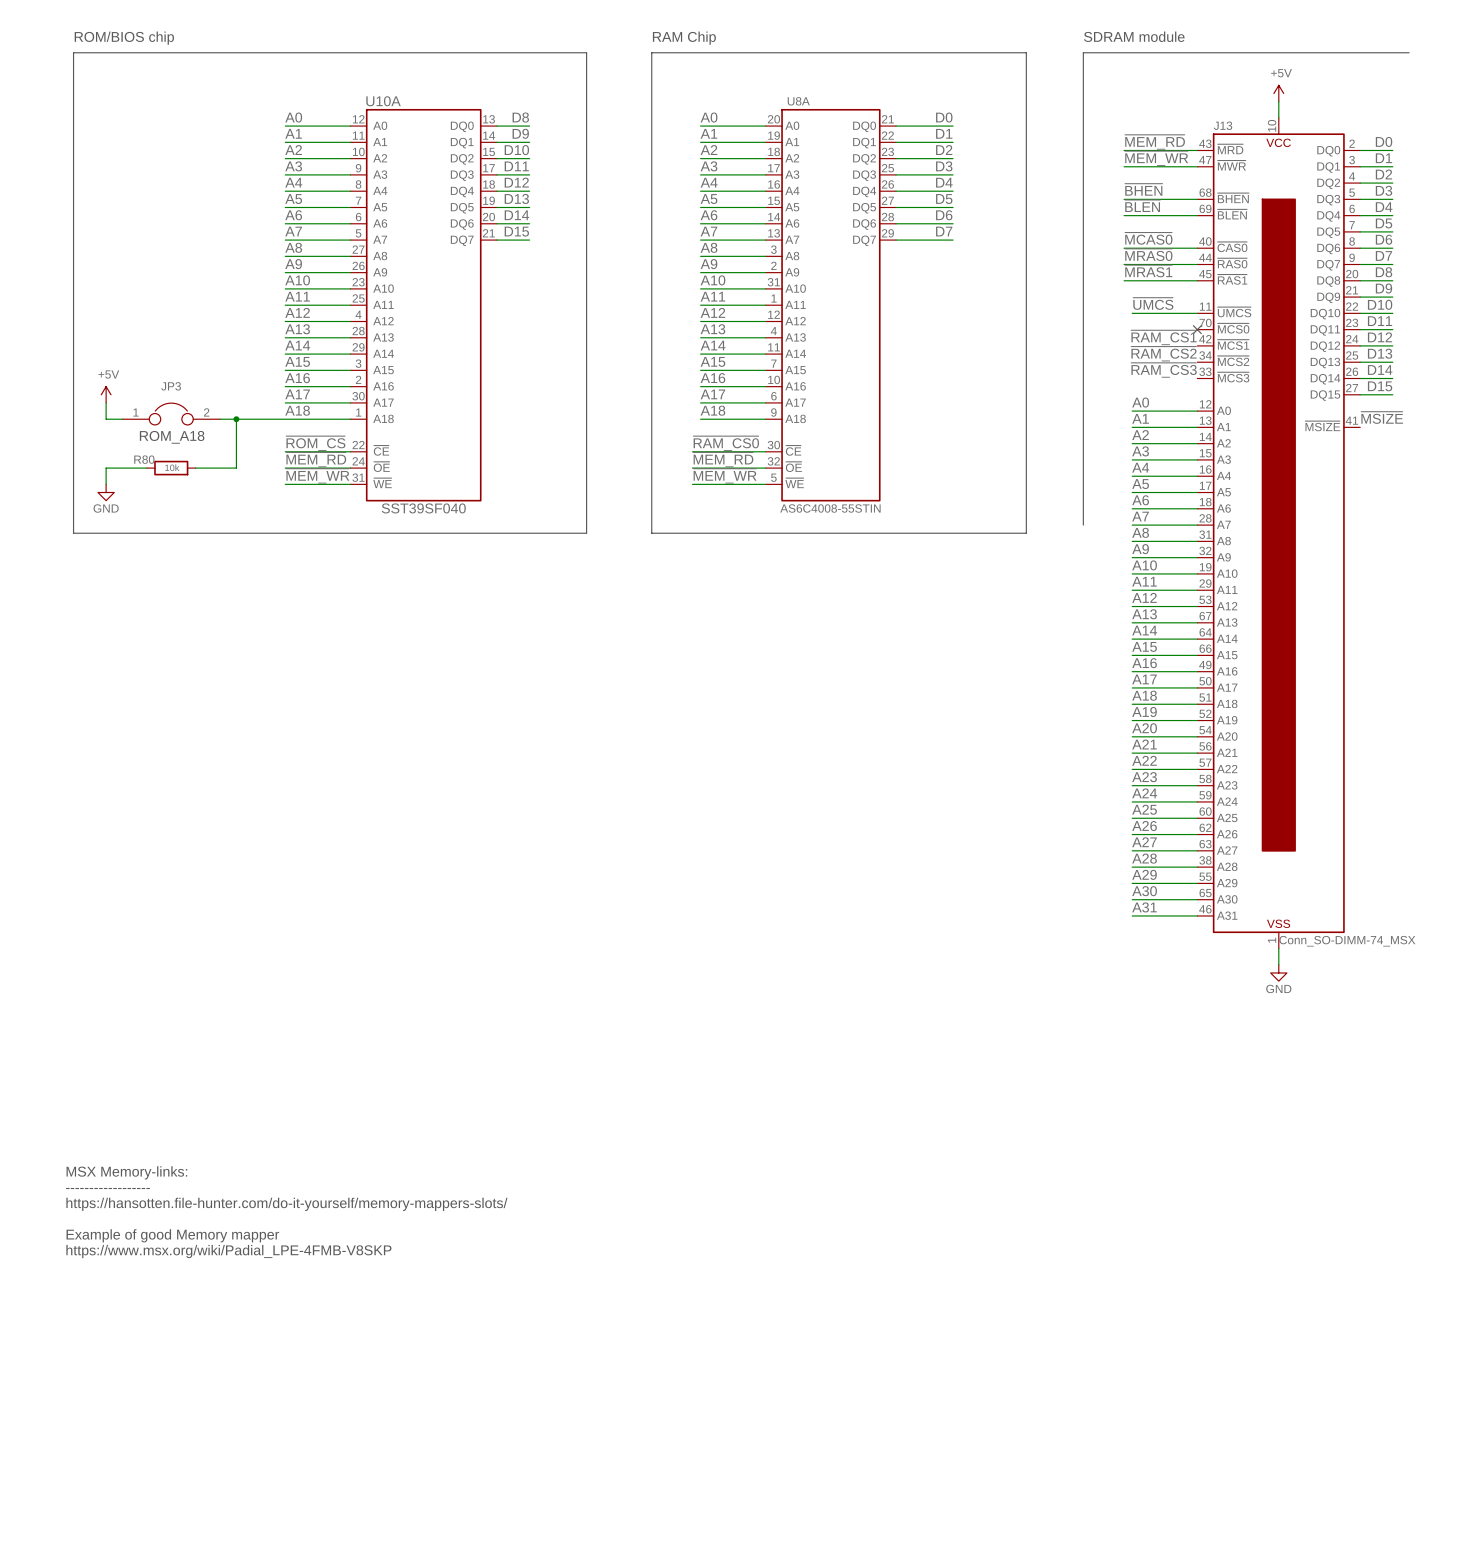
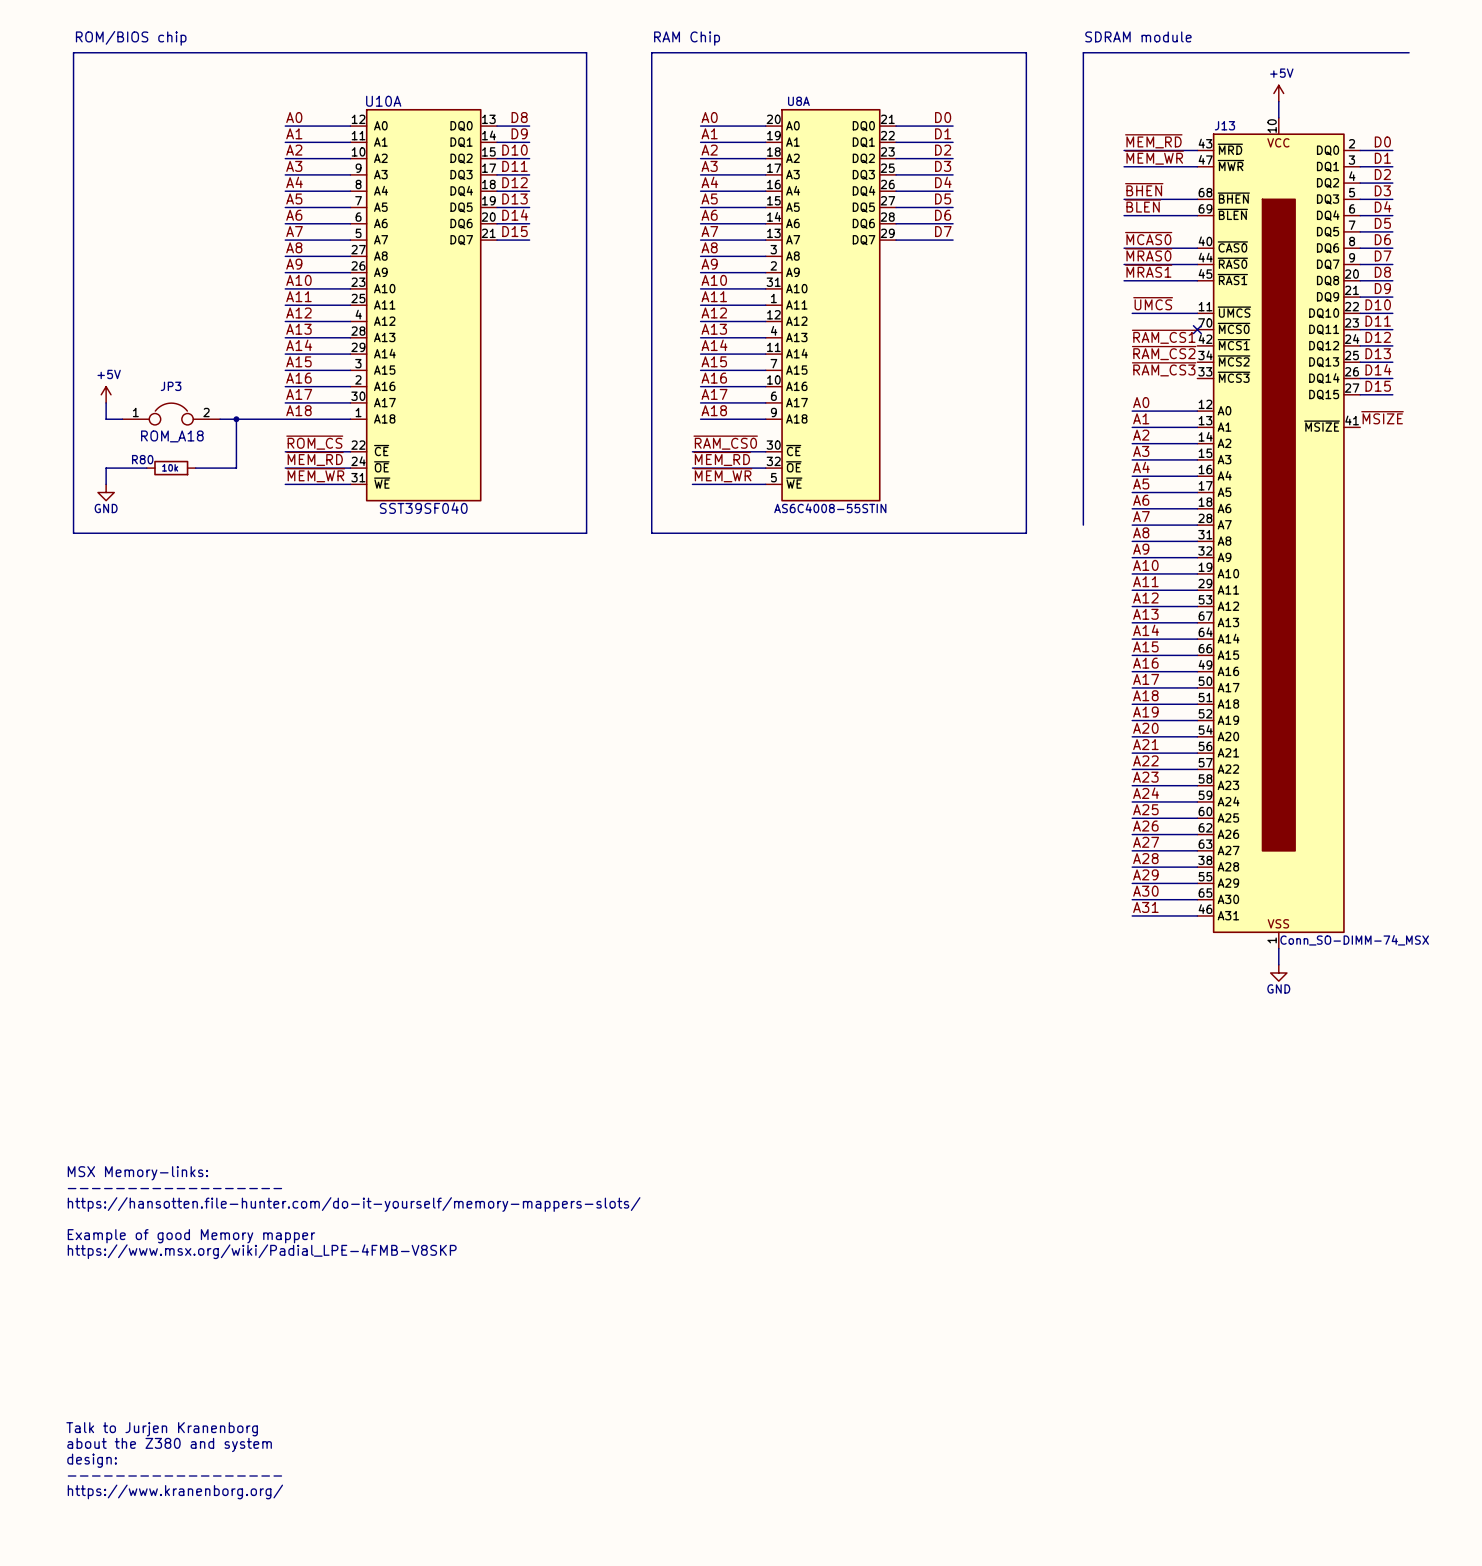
text: none -> Talk to Jurjen Kranenborg (162, 1429)
text: none -> about the Z380 and system (169, 1444)
text: none -> design: (92, 1460)
text: none -> ------------------ (174, 1475)
text: none -> https://www.kranenborg.org/ (175, 1491)

